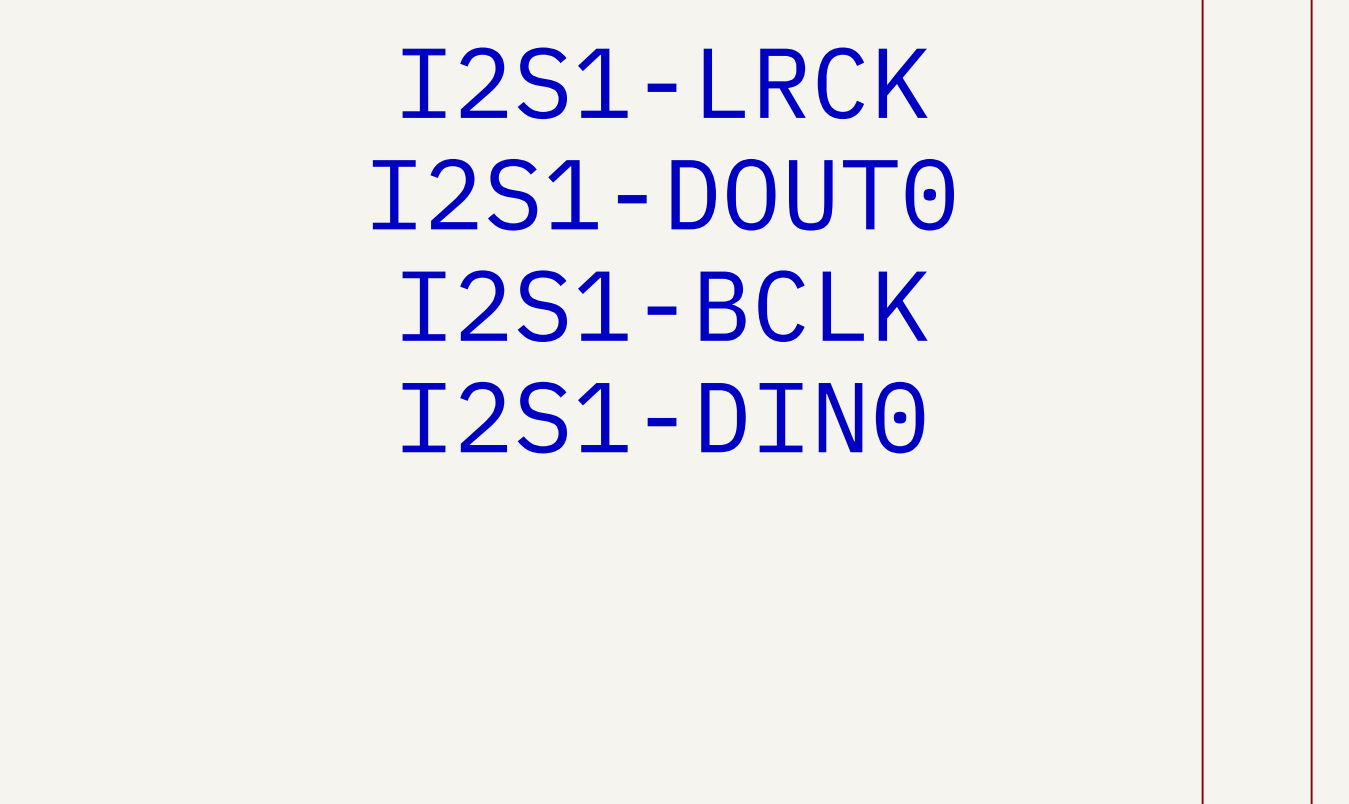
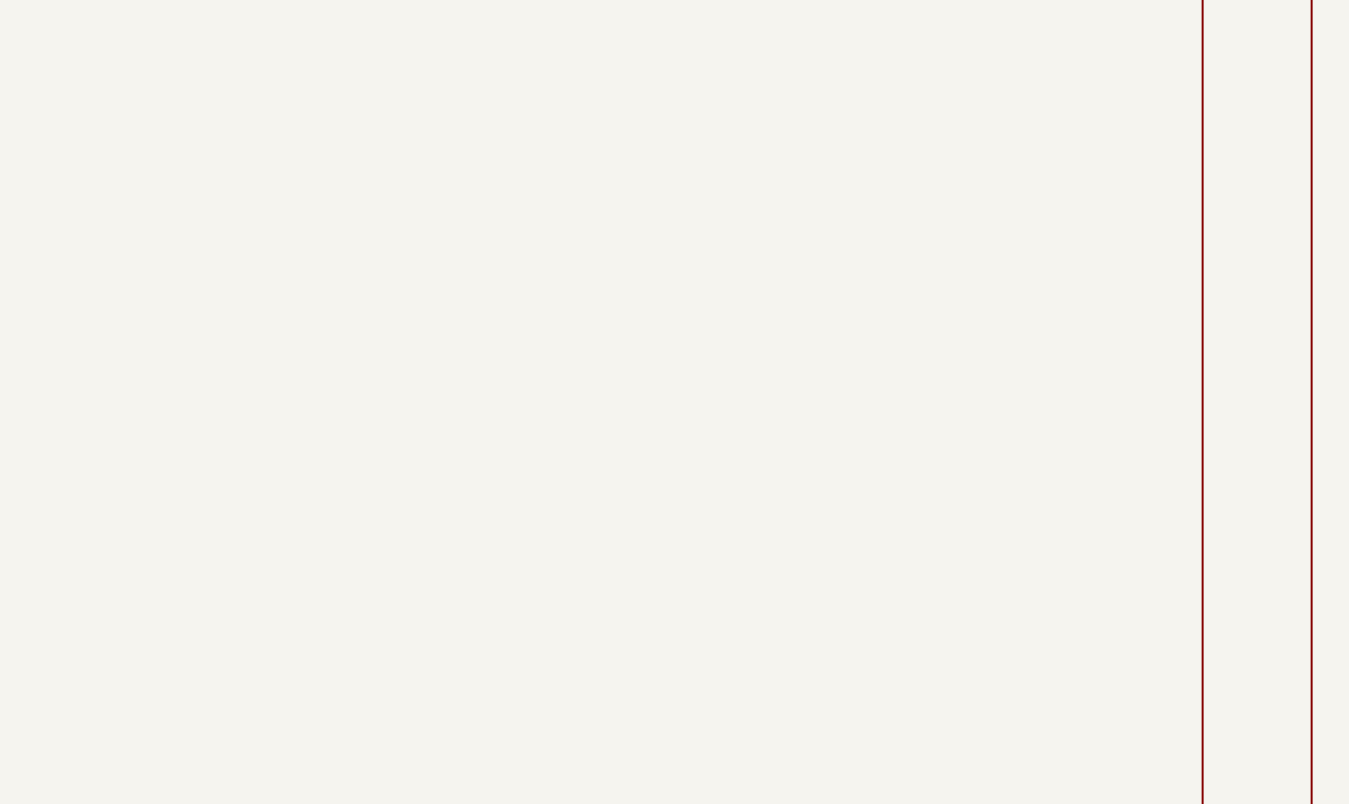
text: I2S1-LRCK (665, 83) -> none
text: I2S1-DOUT0 (663, 194) -> none
text: I2S1-BCLK (665, 306) -> none
text: I2S1-DIN0 (663, 417) -> none

